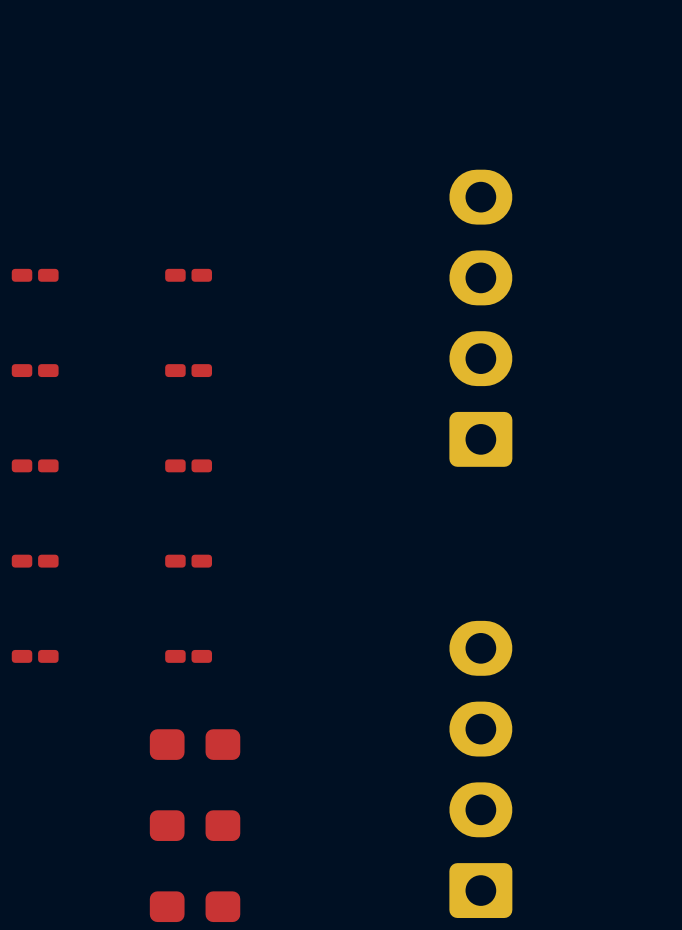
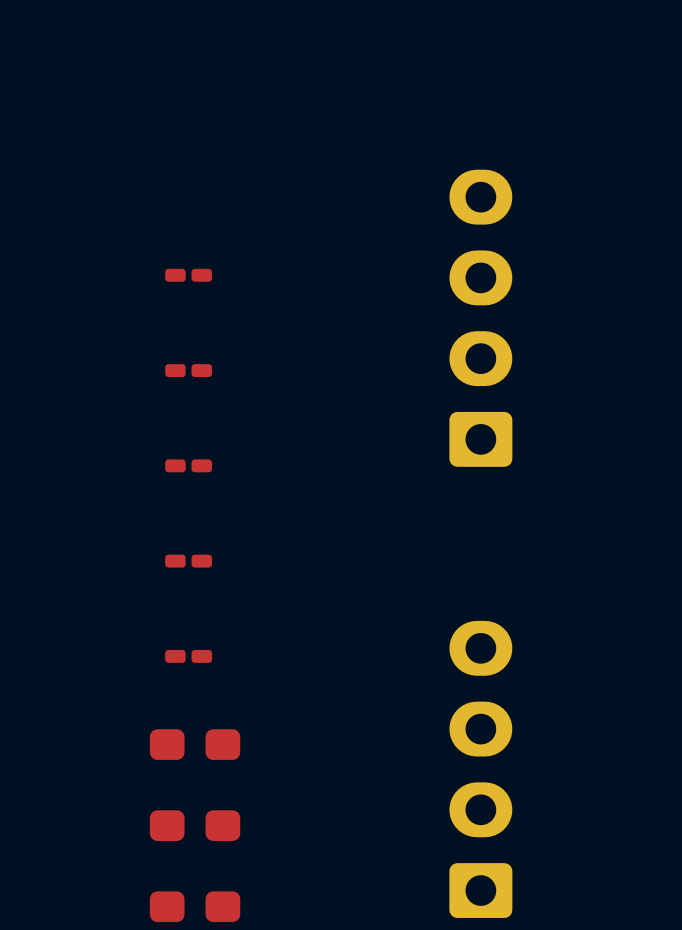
part: (35, 275) -> none
part: (35, 370) -> none
part: (35, 465) -> none
part: (35, 561) -> none
part: (35, 656) -> none

